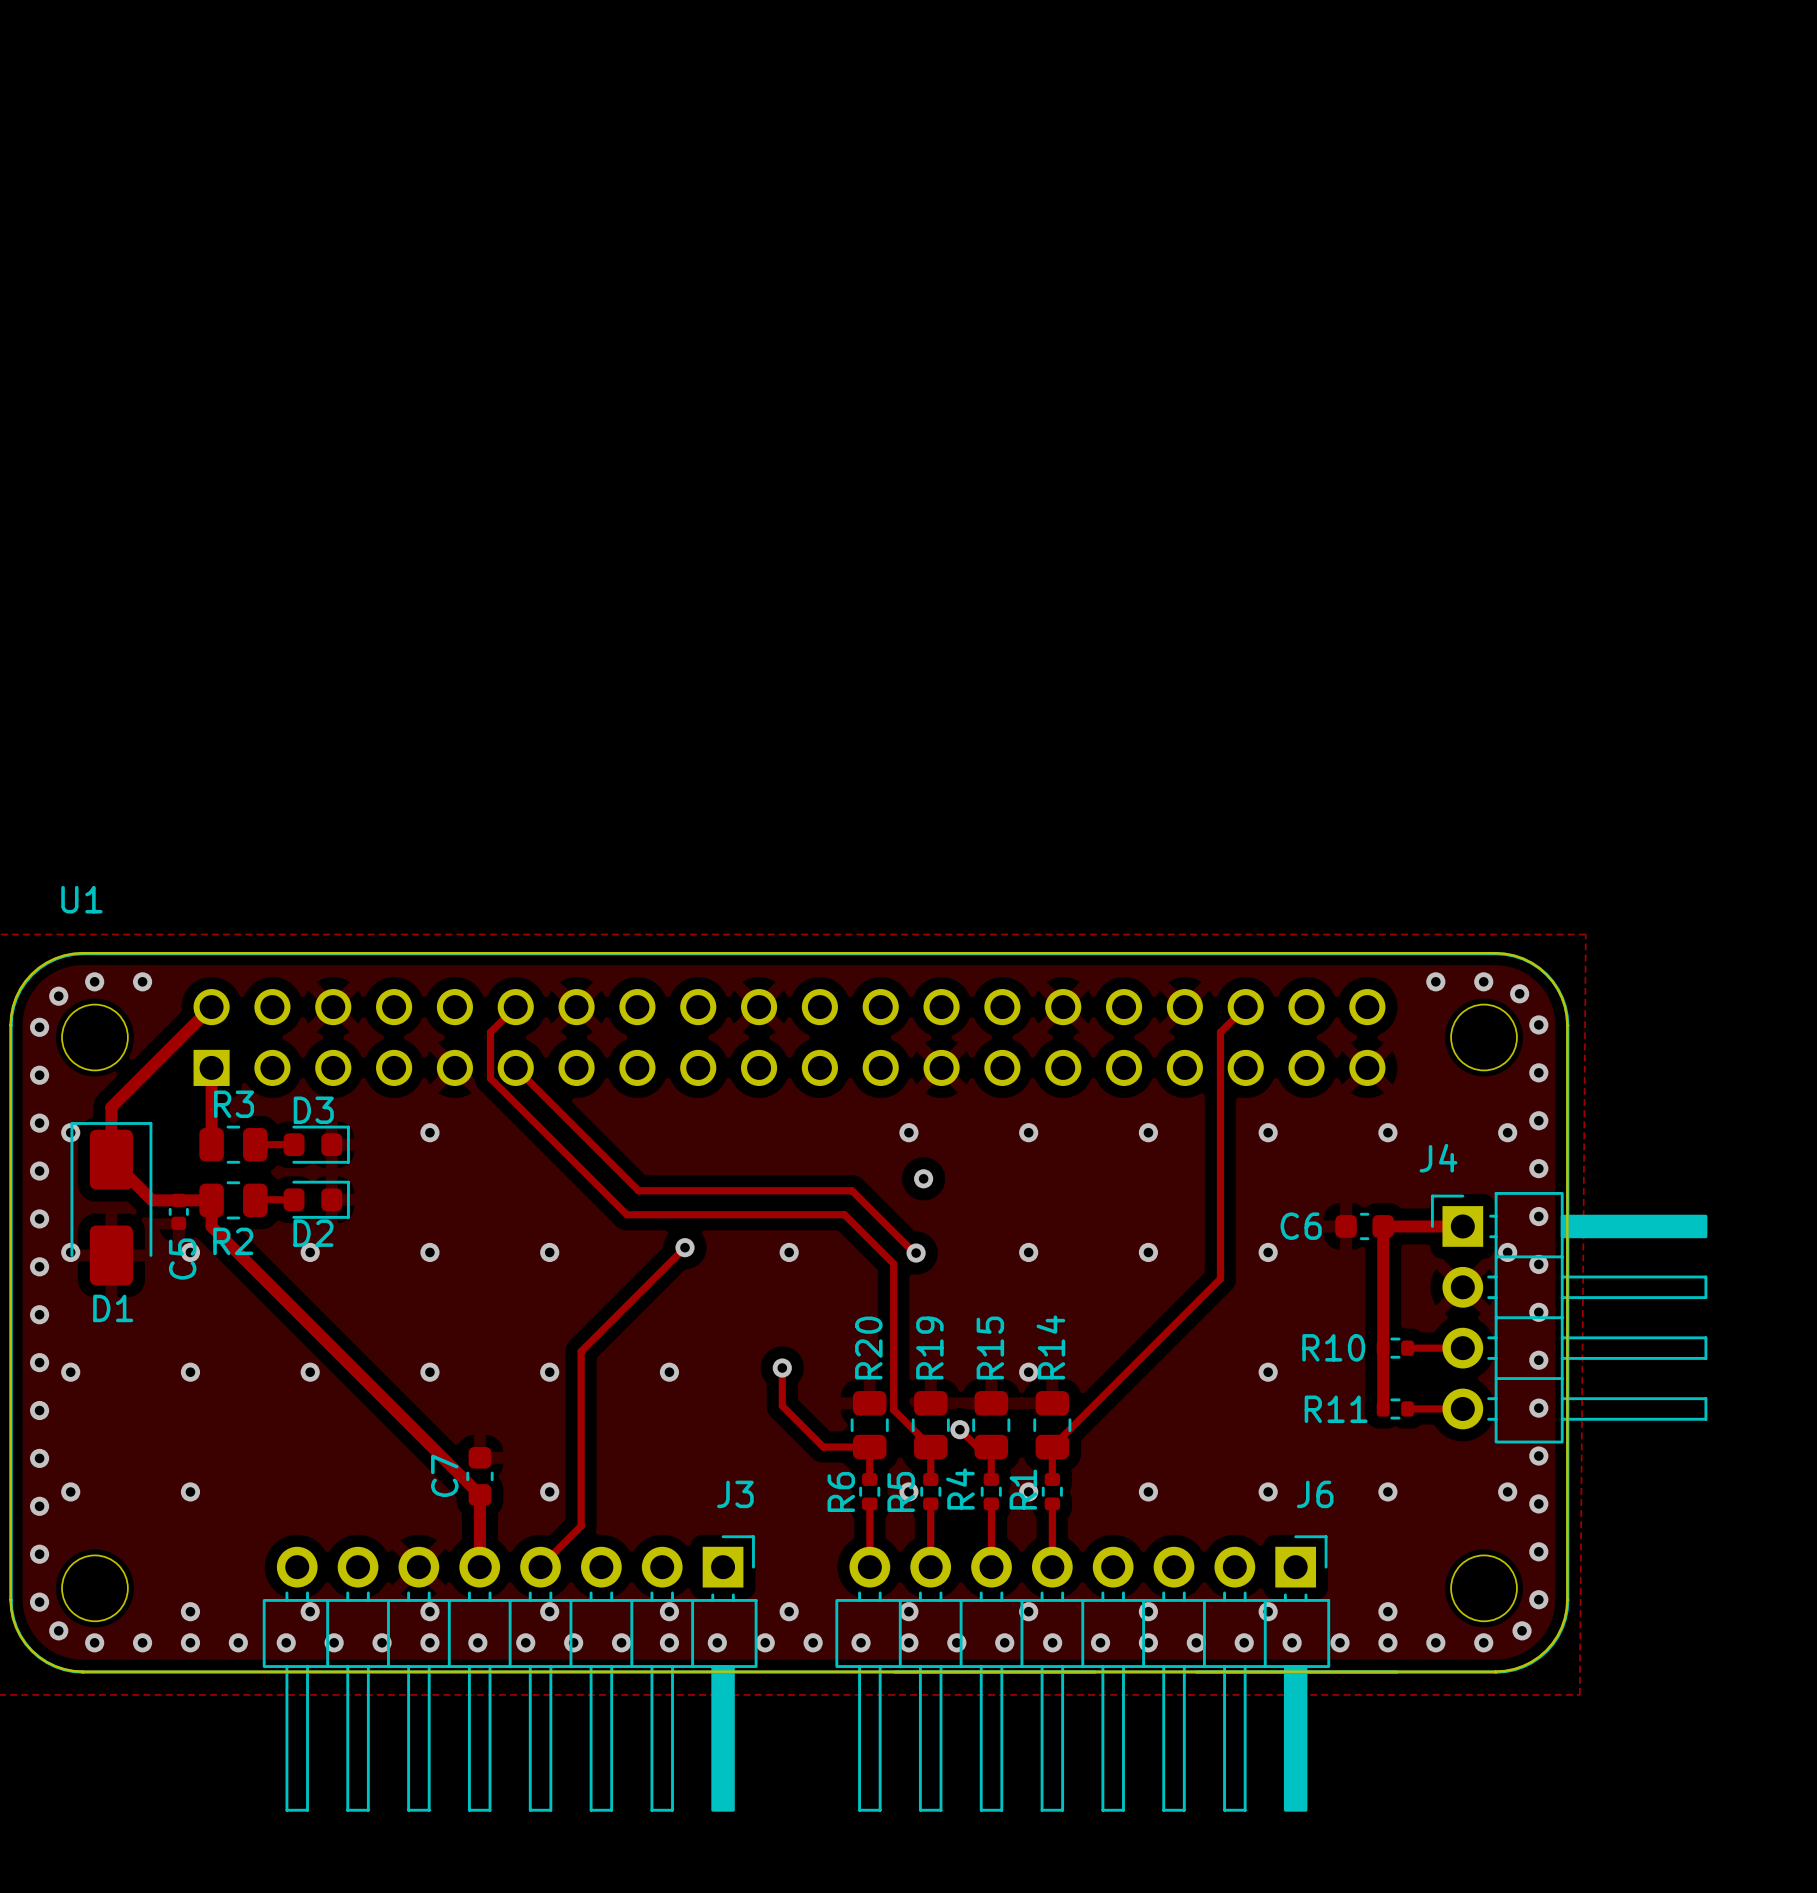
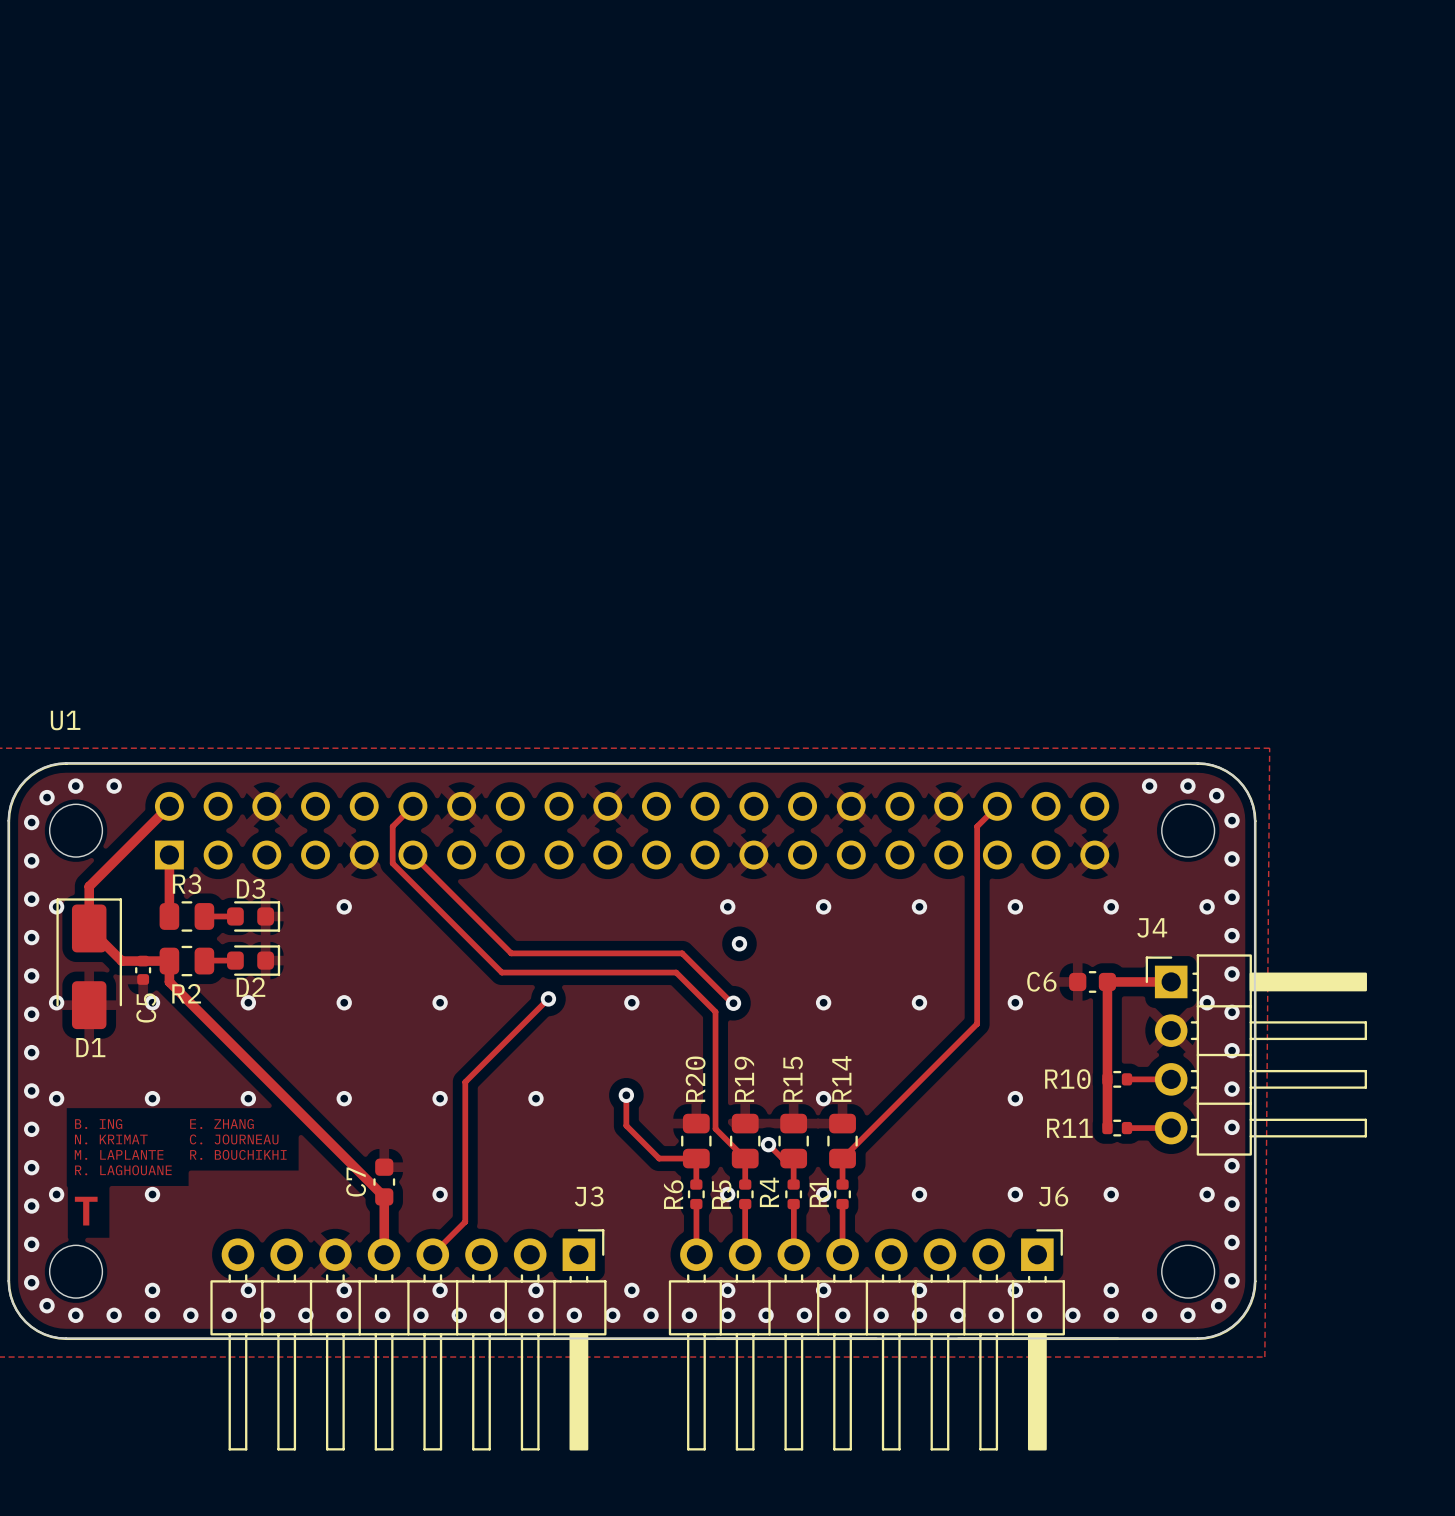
text: none -> B. ING (98, 1124)
text: none -> E. ZHANG (221, 1124)
text: none -> N. KRIMAT (111, 1139)
text: none -> C. JOURNEAU (234, 1139)
text: none -> M. LAPLANTE (119, 1154)
text: none -> R. BOUCHIKHI (238, 1154)
text: none -> R. LAGHOUANE (123, 1170)
text: none -> T (86, 1211)

